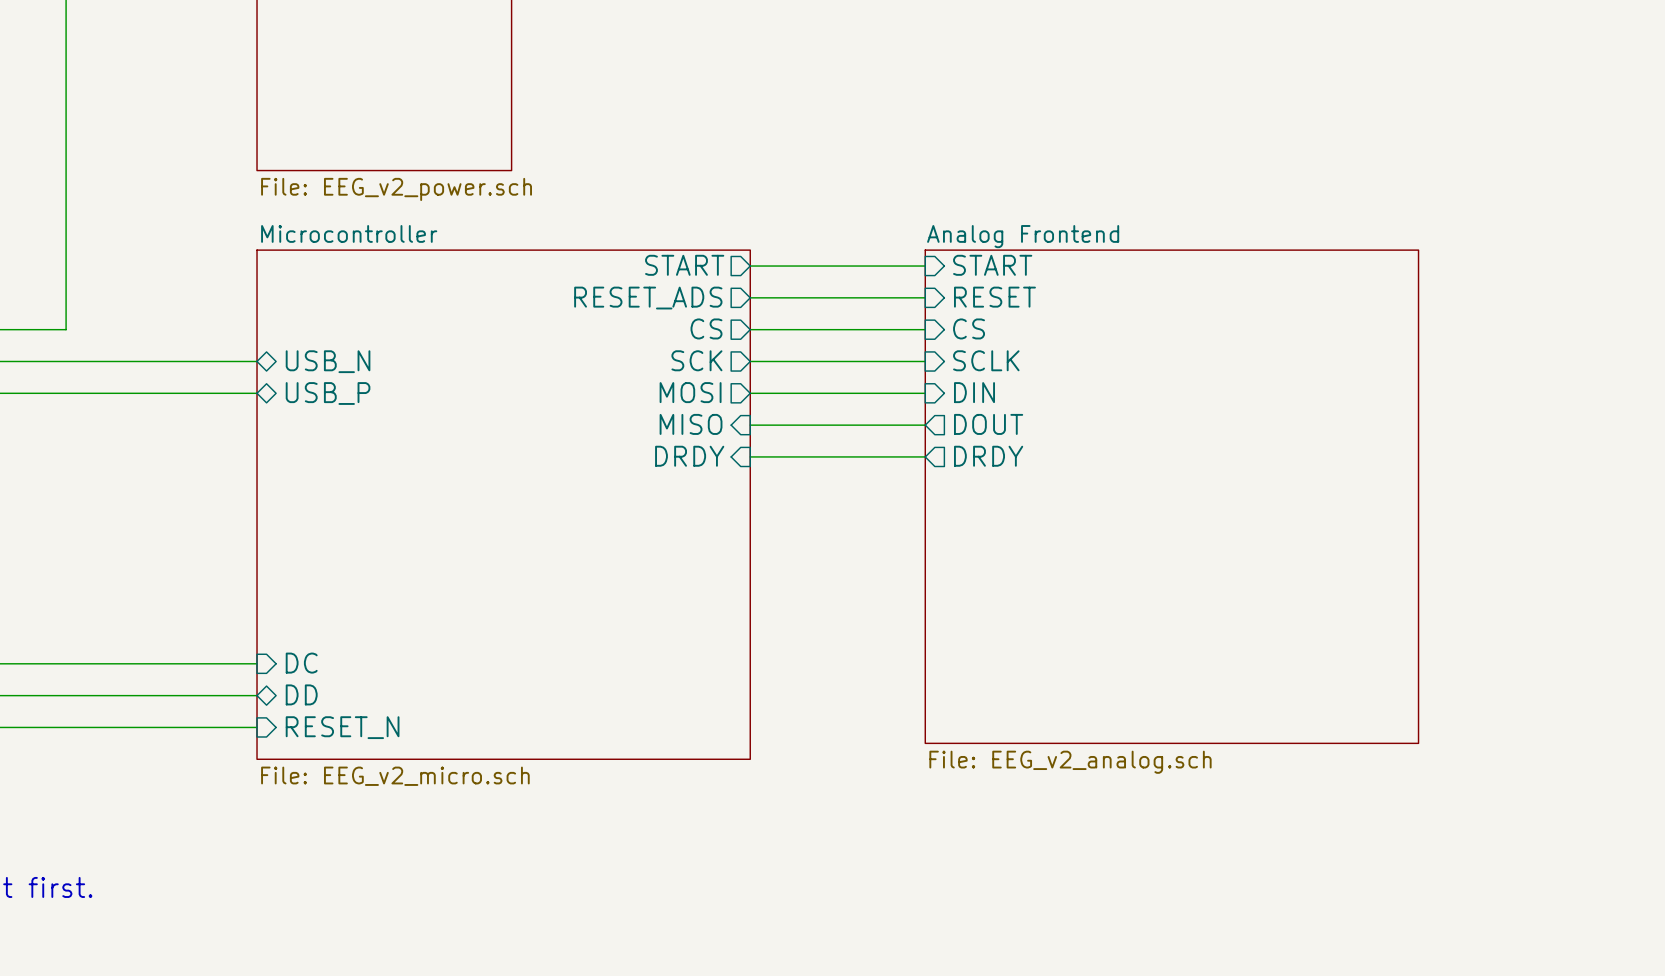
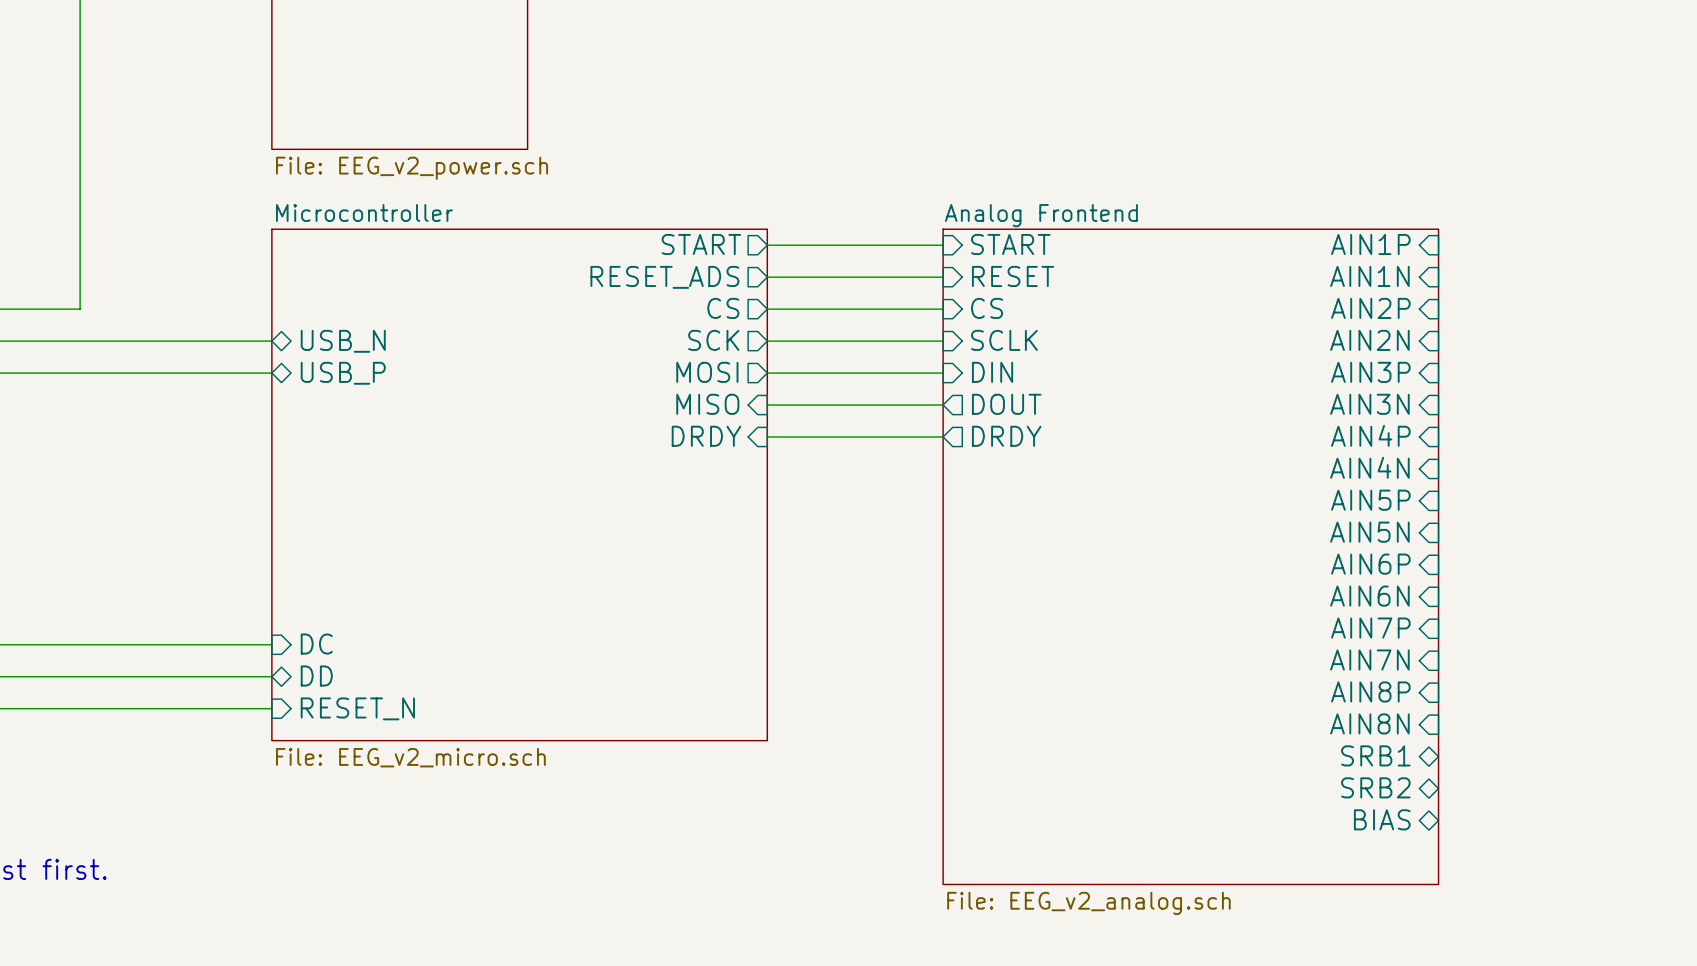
sheet pin: none -> AIN1P (1370, 244)
sheet pin: none -> AIN1N (1369, 276)
sheet pin: none -> AIN2P (1370, 308)
sheet pin: none -> AIN2N (1369, 340)
sheet pin: none -> AIN3P (1370, 372)
sheet pin: none -> AIN3N (1369, 404)
sheet pin: none -> AIN4P (1370, 435)
sheet pin: none -> AIN4N (1369, 467)
sheet Analog Frontend: File: EEG_v2_analog.sch (1171, 496) -> none
sheet pin: none -> AIN5P (1370, 500)
sheet pin: none -> AIN5N (1369, 532)
sheet Analog Frontend: none -> File: EEG_v2_analog.sch (1190, 556)
sheet pin: none -> AIN6P (1370, 564)
sheet pin: none -> AIN6N (1369, 596)
sheet pin: none -> AIN7P (1370, 628)
sheet pin: none -> AIN7N (1369, 660)
sheet pin: none -> AIN8P (1370, 691)
sheet pin: none -> AIN8N (1369, 723)
sheet pin: none -> SRB1 (1375, 755)
sheet pin: none -> SRB2 (1375, 787)
sheet pin: none -> BIAS (1382, 819)

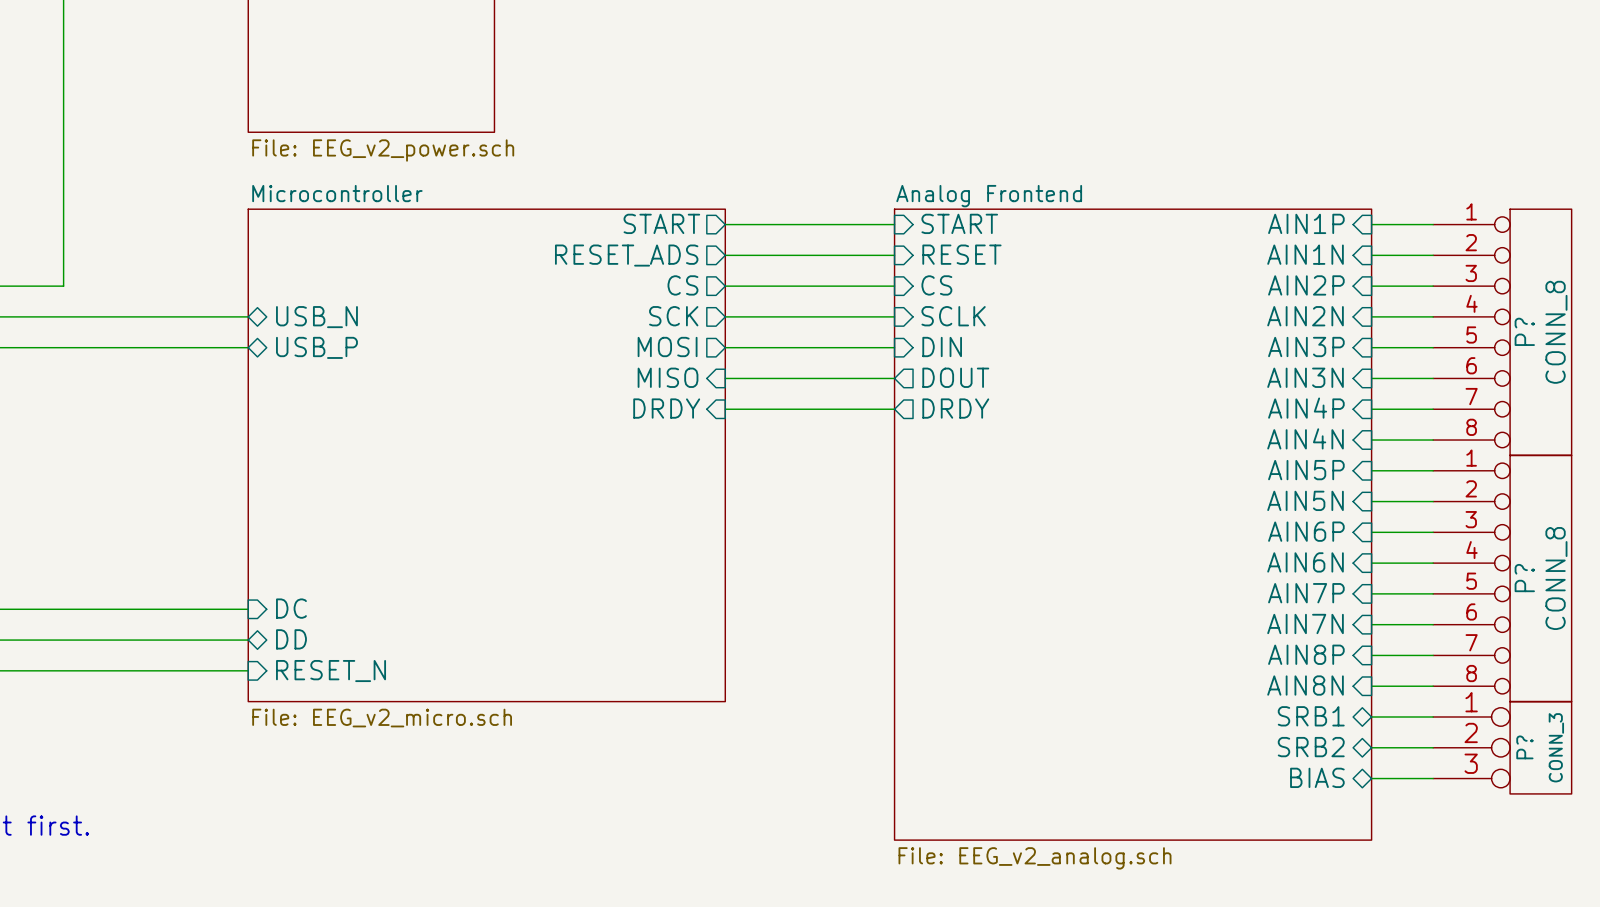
wire: none -> (1371, 224) (1433, 224)
wire: none -> (1371, 255) (1433, 255)
wire: none -> (1371, 286) (1433, 286)
wire: none -> (1371, 316) (1433, 316)
P?: none -> CONN_8 (1502, 332)
wire: none -> (1371, 347) (1433, 347)
wire: none -> (1371, 378) (1433, 378)
wire: none -> (1371, 409) (1433, 409)
wire: none -> (1371, 440) (1433, 440)
wire: none -> (1371, 470) (1433, 470)
wire: none -> (1371, 501) (1433, 501)
wire: none -> (1371, 532) (1433, 532)
wire: none -> (1371, 563) (1433, 563)
P?: none -> CONN_8 (1502, 578)
wire: none -> (1371, 593) (1433, 593)
wire: none -> (1371, 624) (1433, 624)
wire: none -> (1371, 655) (1433, 655)
wire: none -> (1371, 686) (1433, 686)
wire: none -> (1371, 716) (1433, 716)
wire: none -> (1371, 747) (1433, 747)
P?: none -> CONN_3 (1502, 747)
wire: none -> (1371, 778) (1433, 778)

